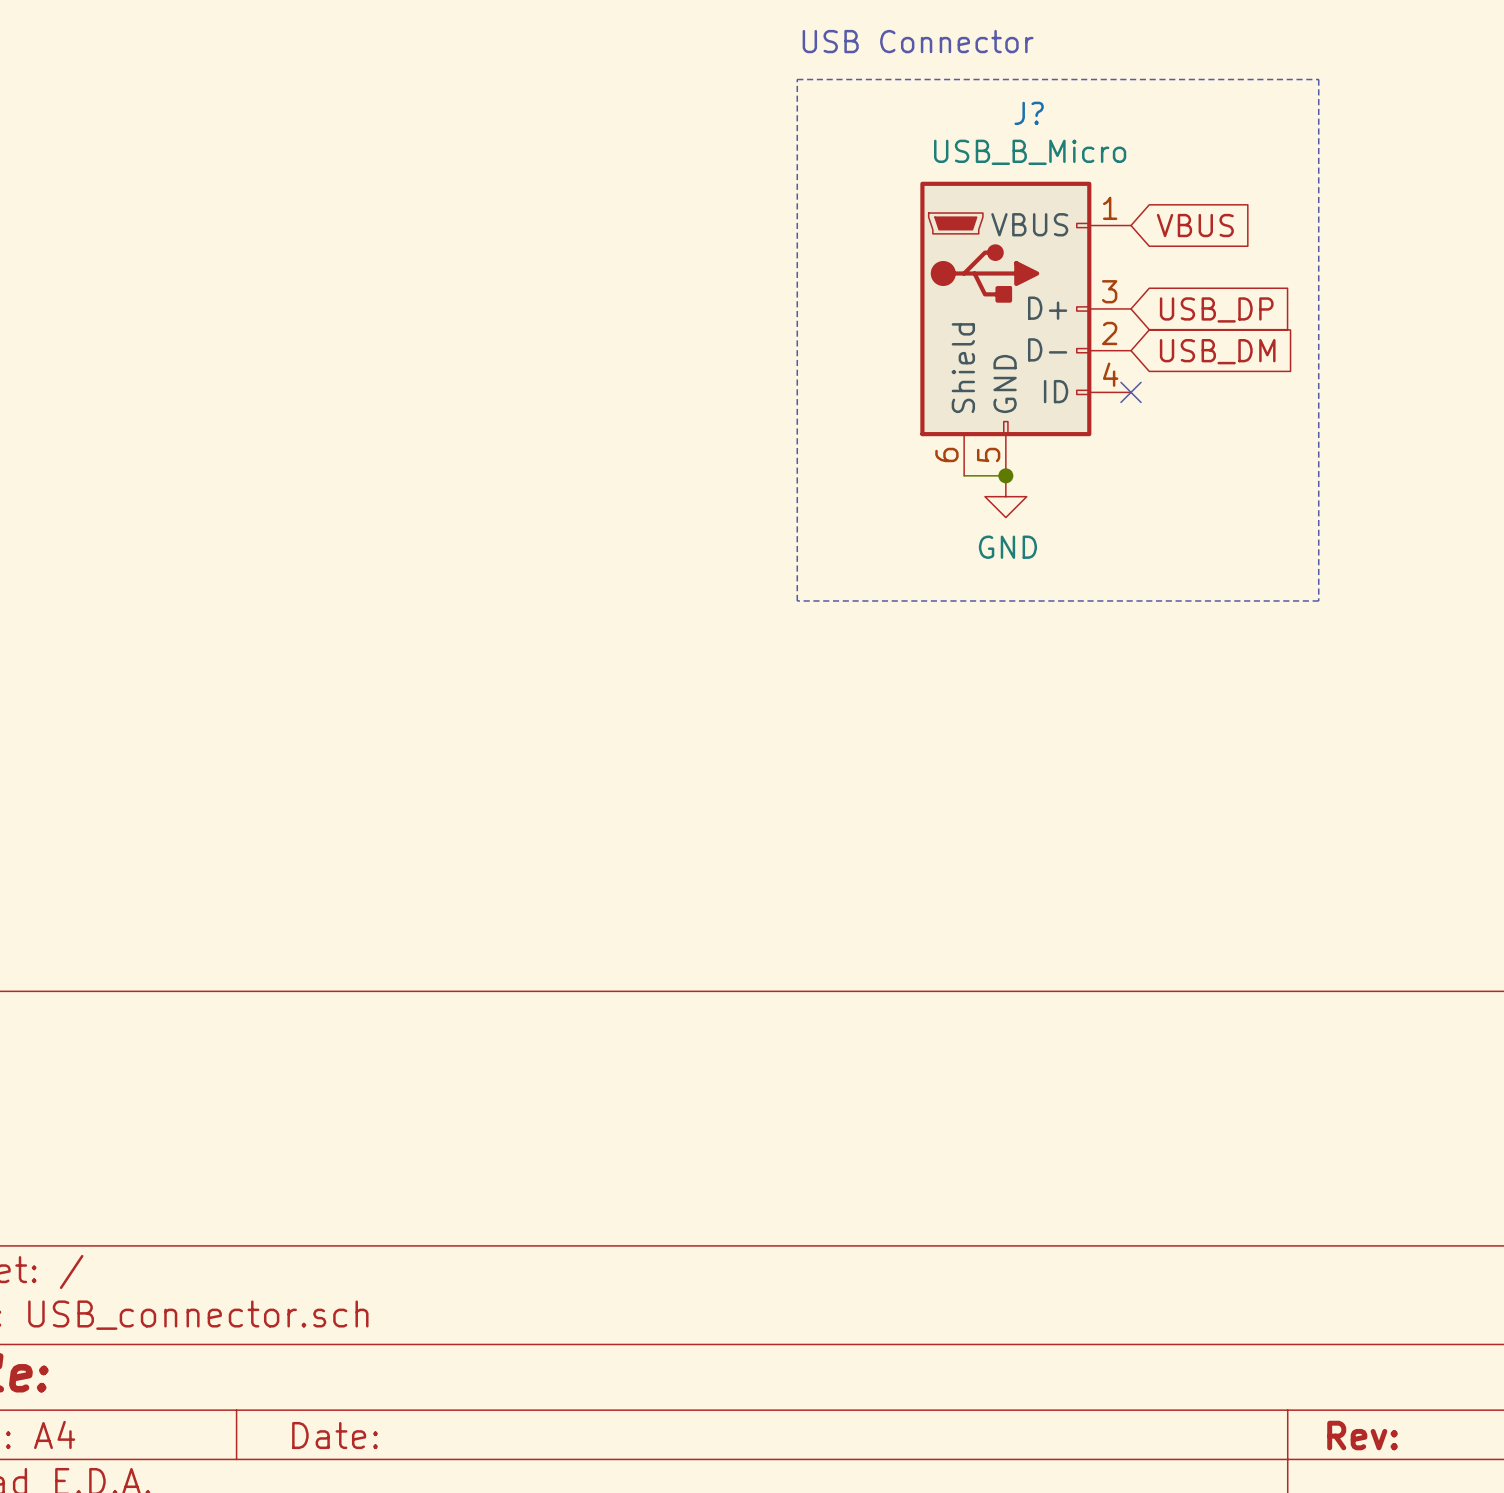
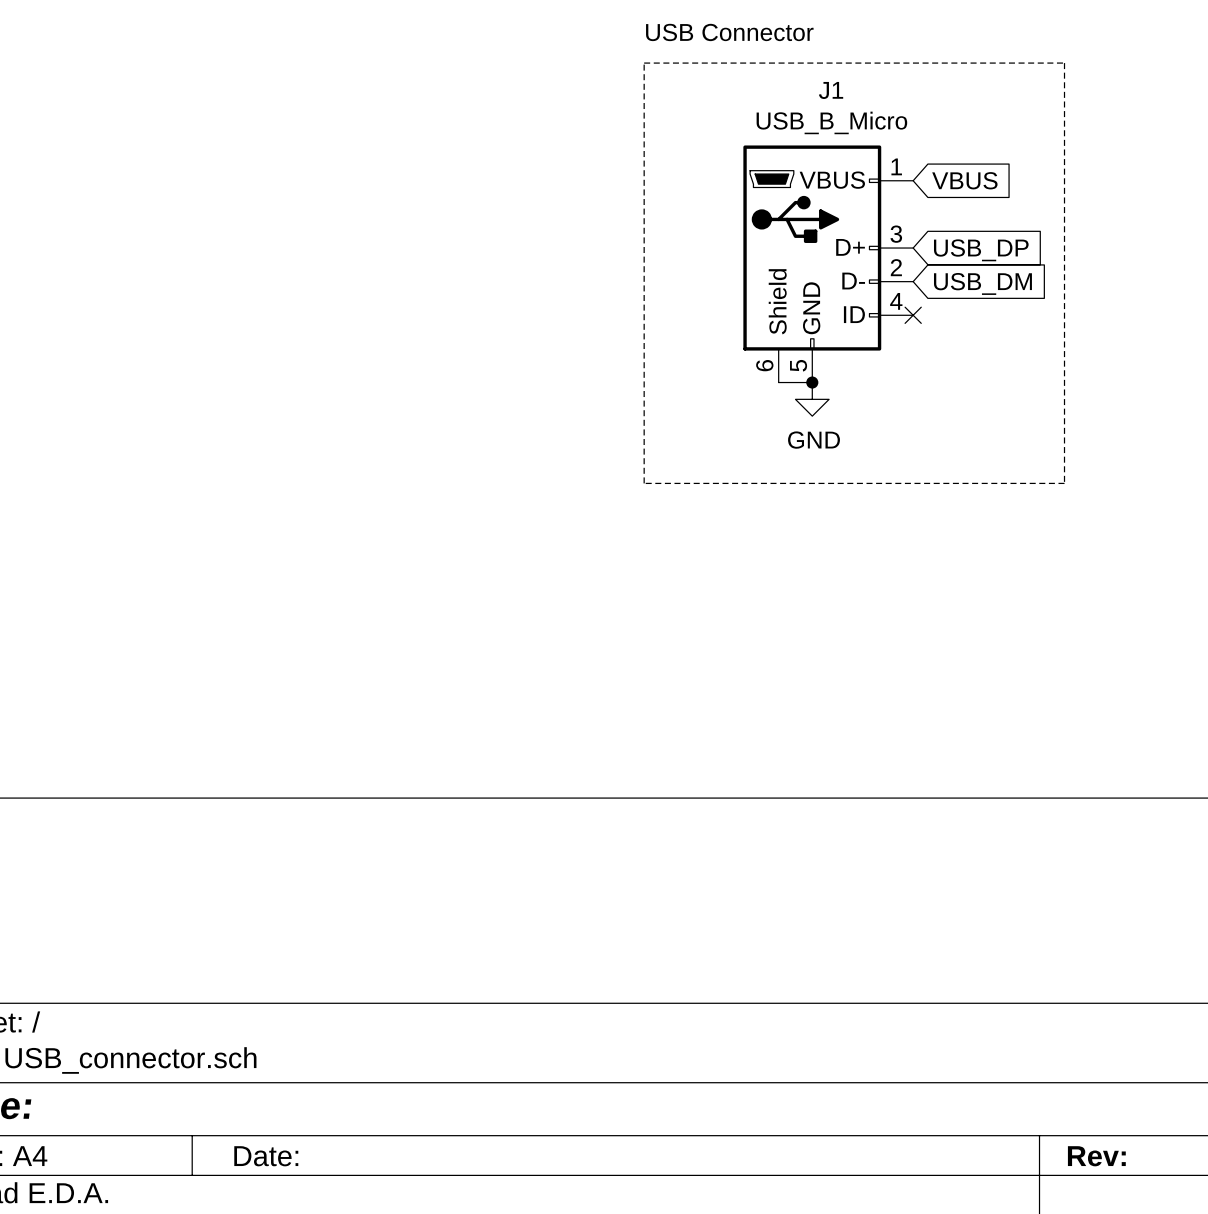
J? name: J? (1029, 113) -> J1 (831, 90)

